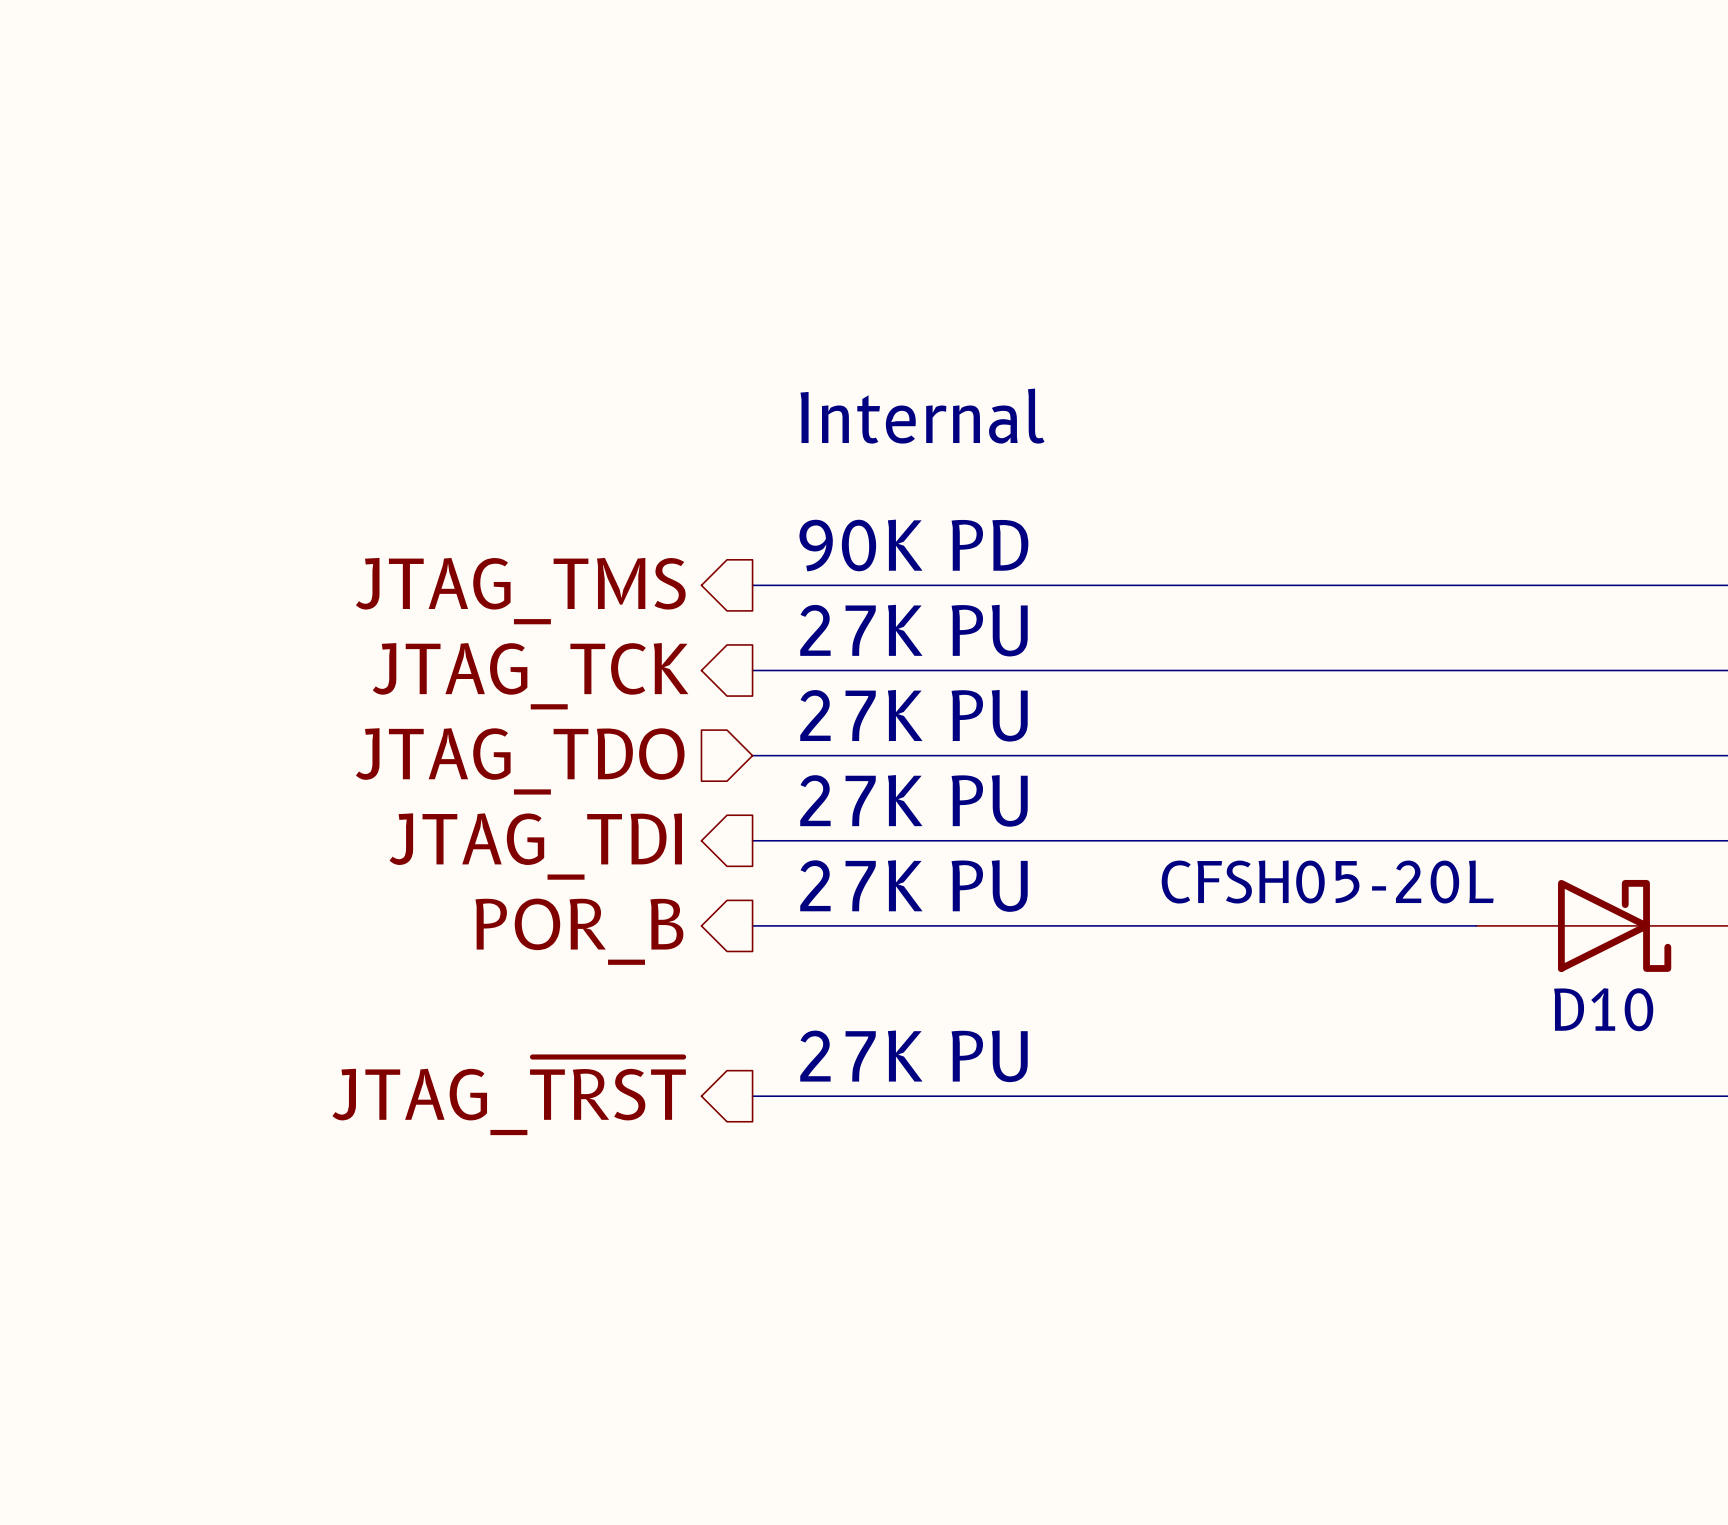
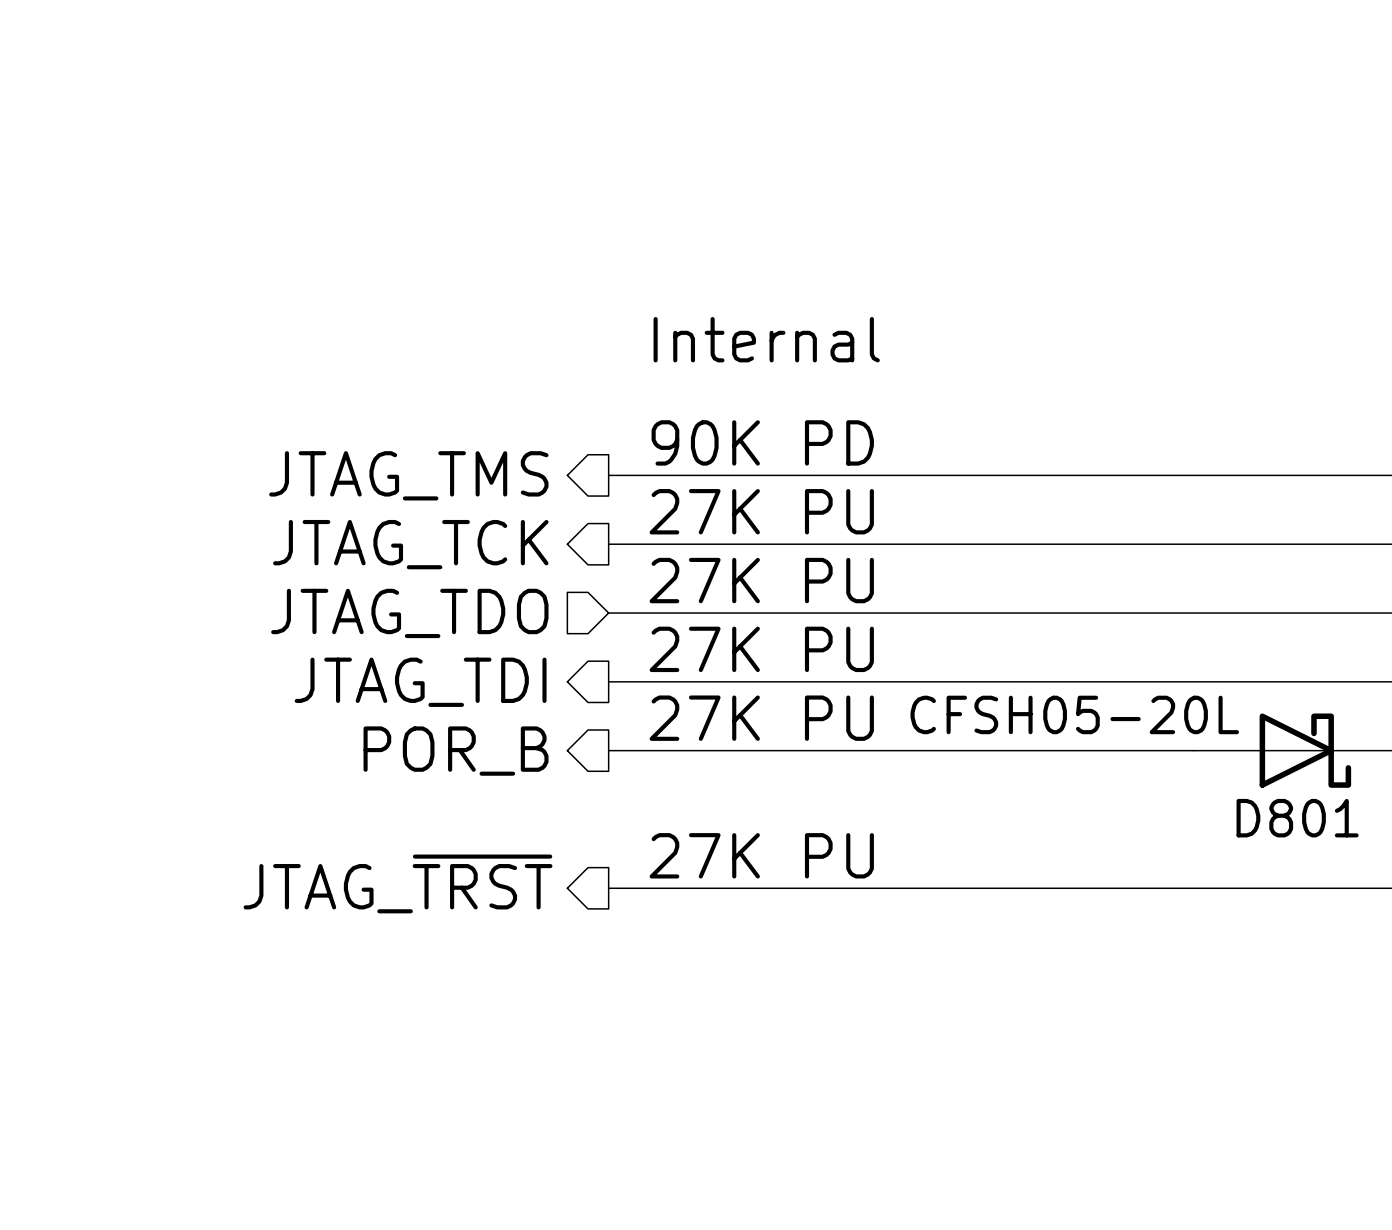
D10 name: D10 (1603, 1009) -> D801 (1297, 818)

